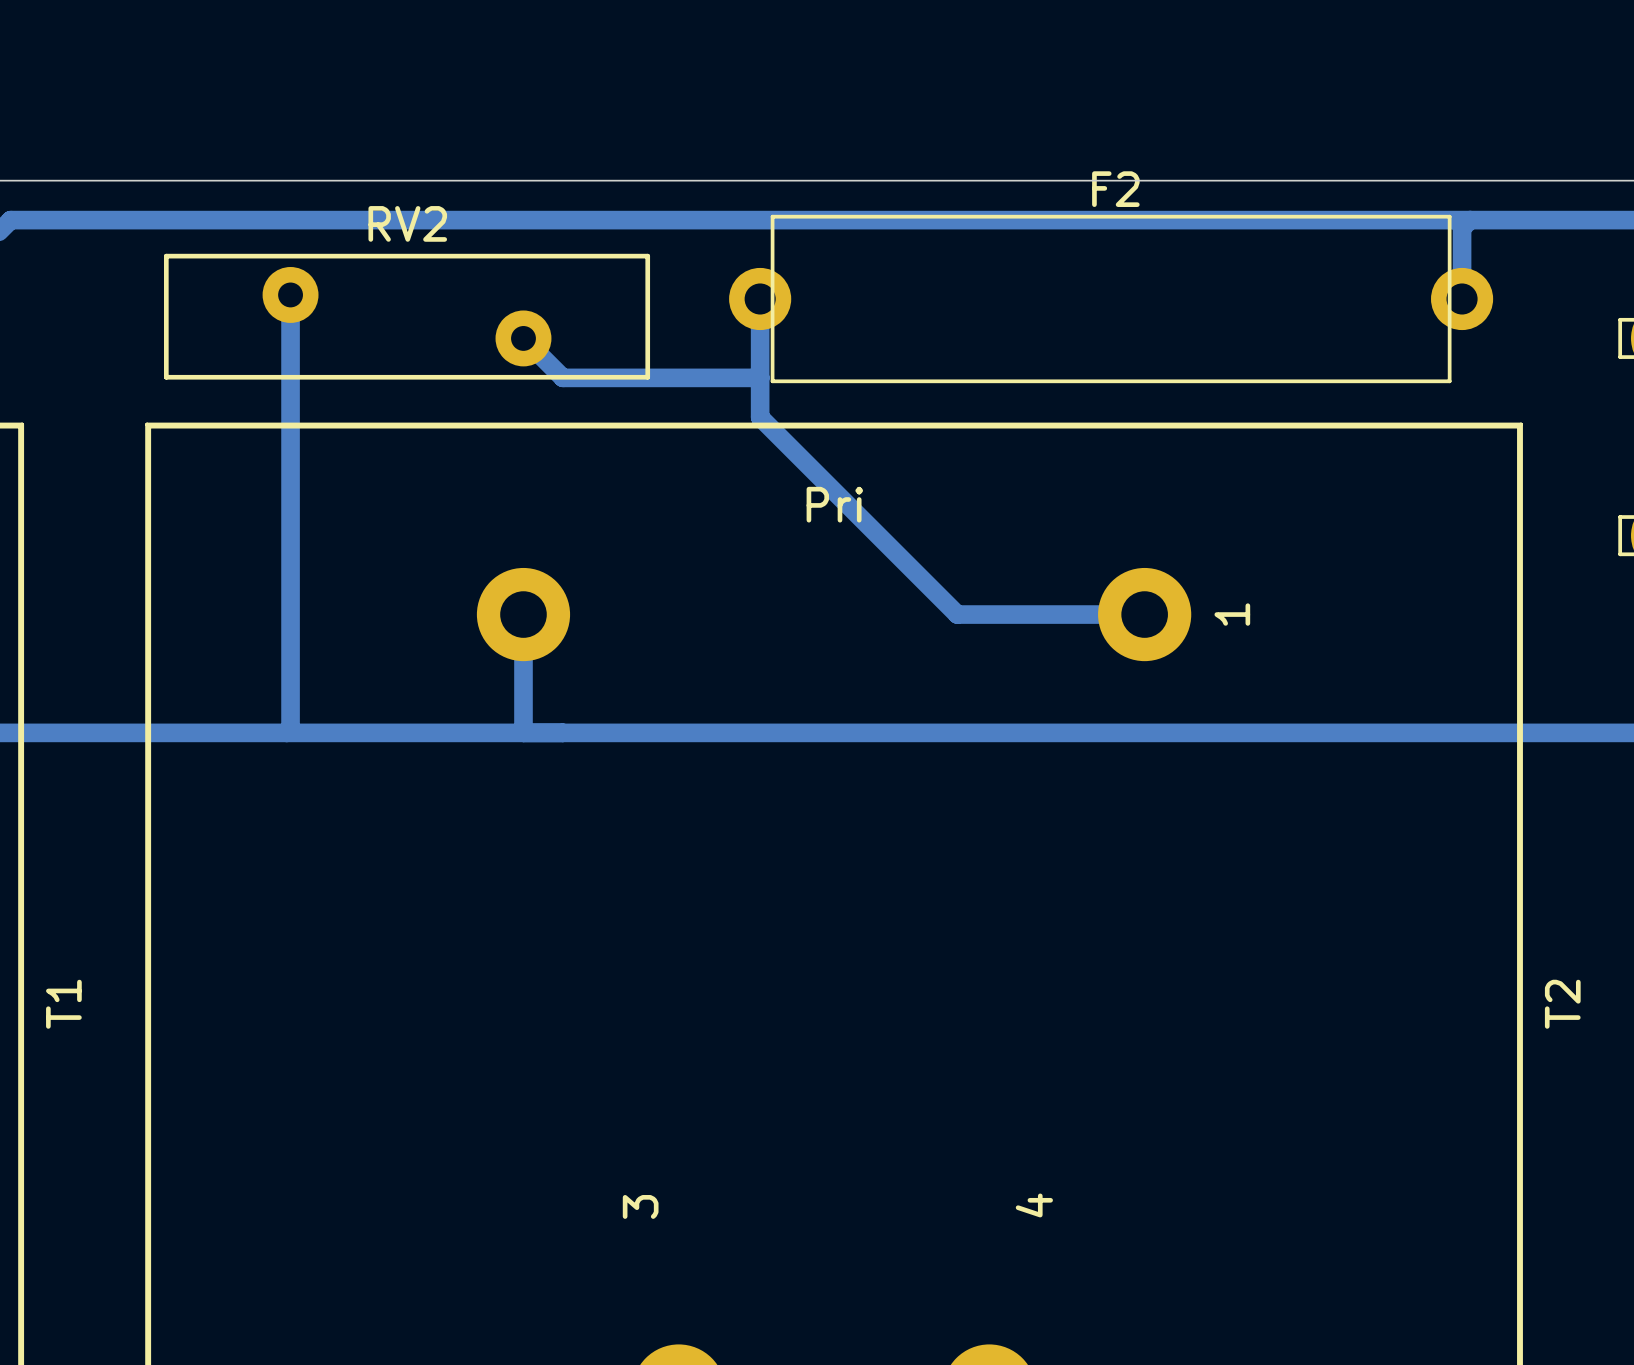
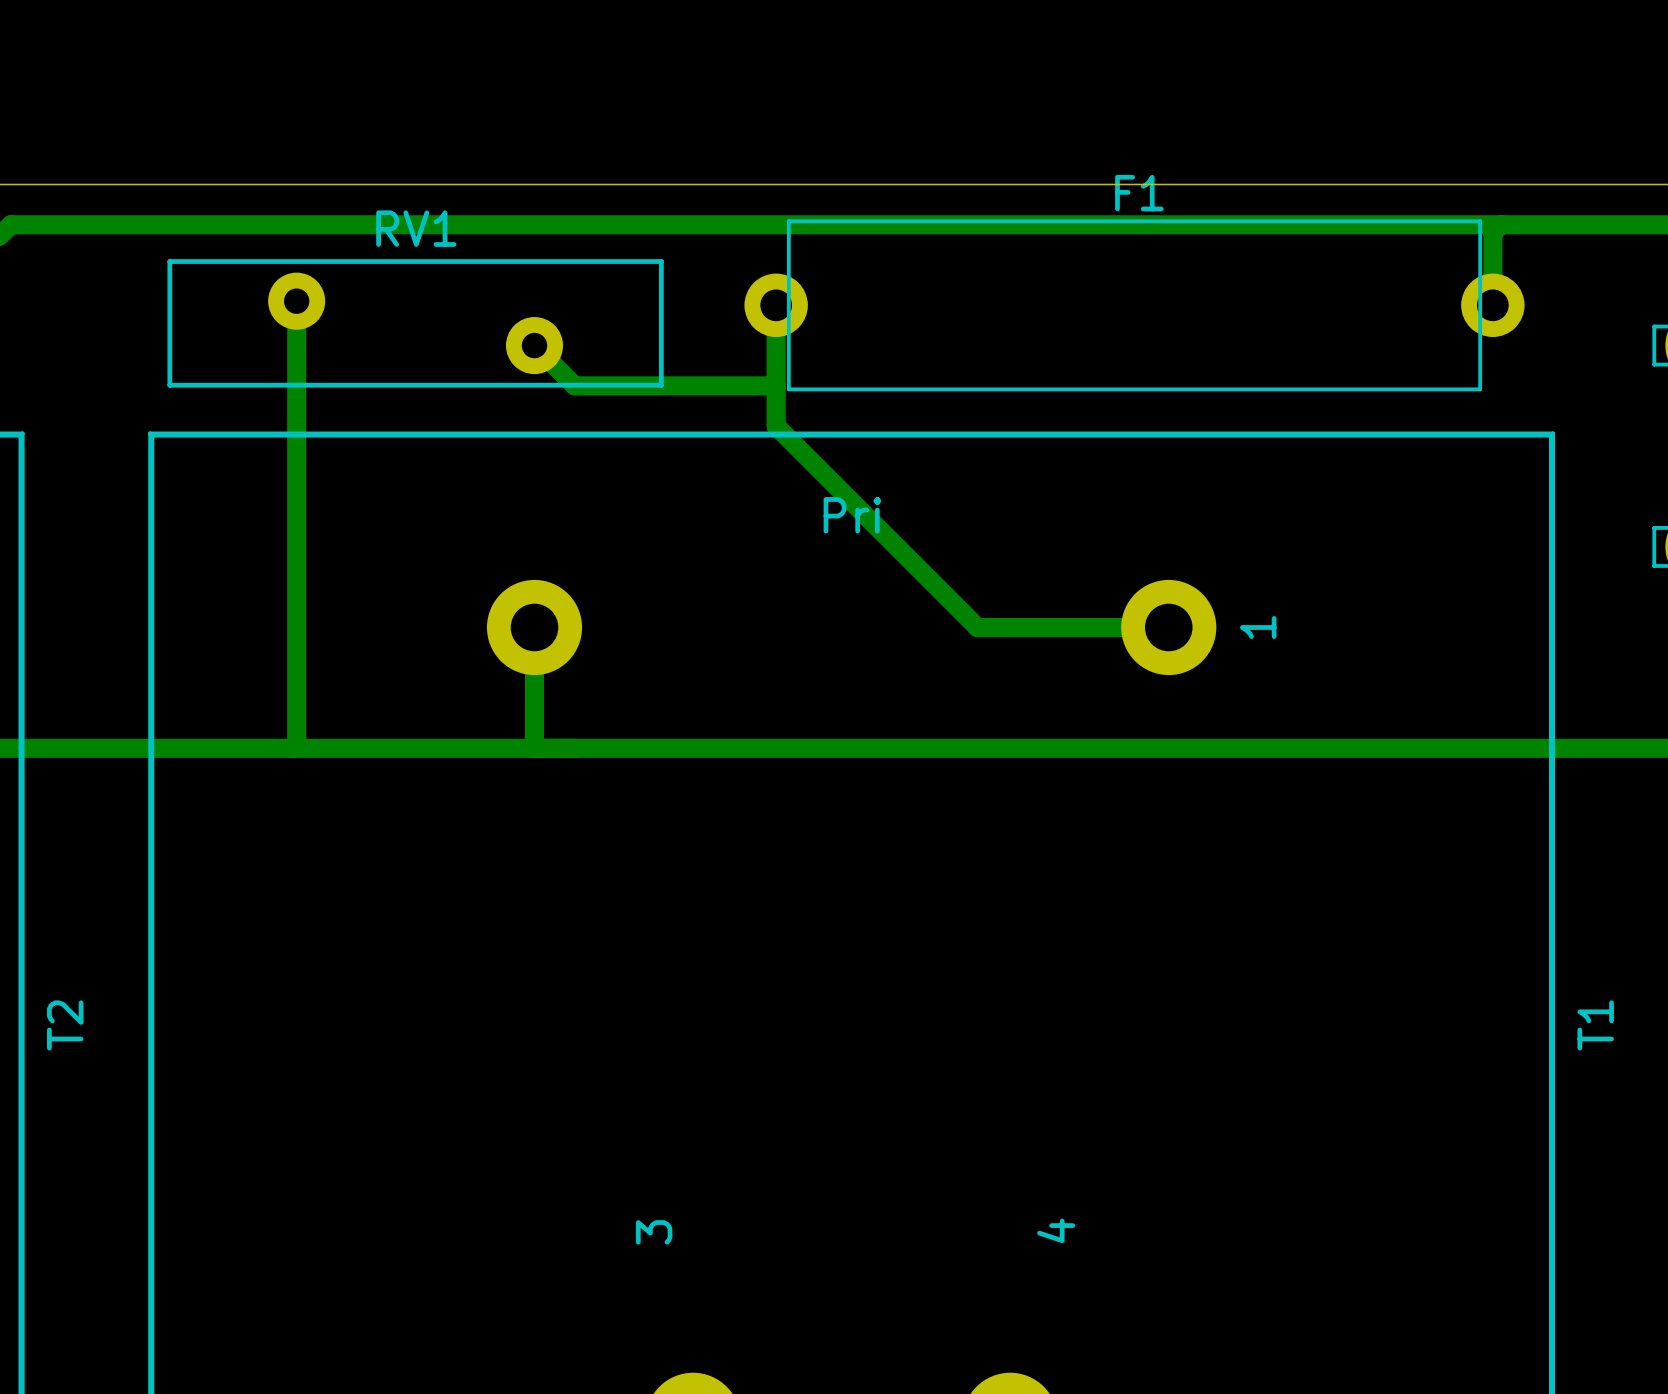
F2 name: F2 (1115, 189) -> F1 (1139, 193)
RV2 name: RV2 (407, 223) -> RV1 (416, 228)
T1 name: T1 (63, 1004) -> T2 (65, 1025)
T2 name: T2 (1562, 1004) -> T1 (1595, 1025)

